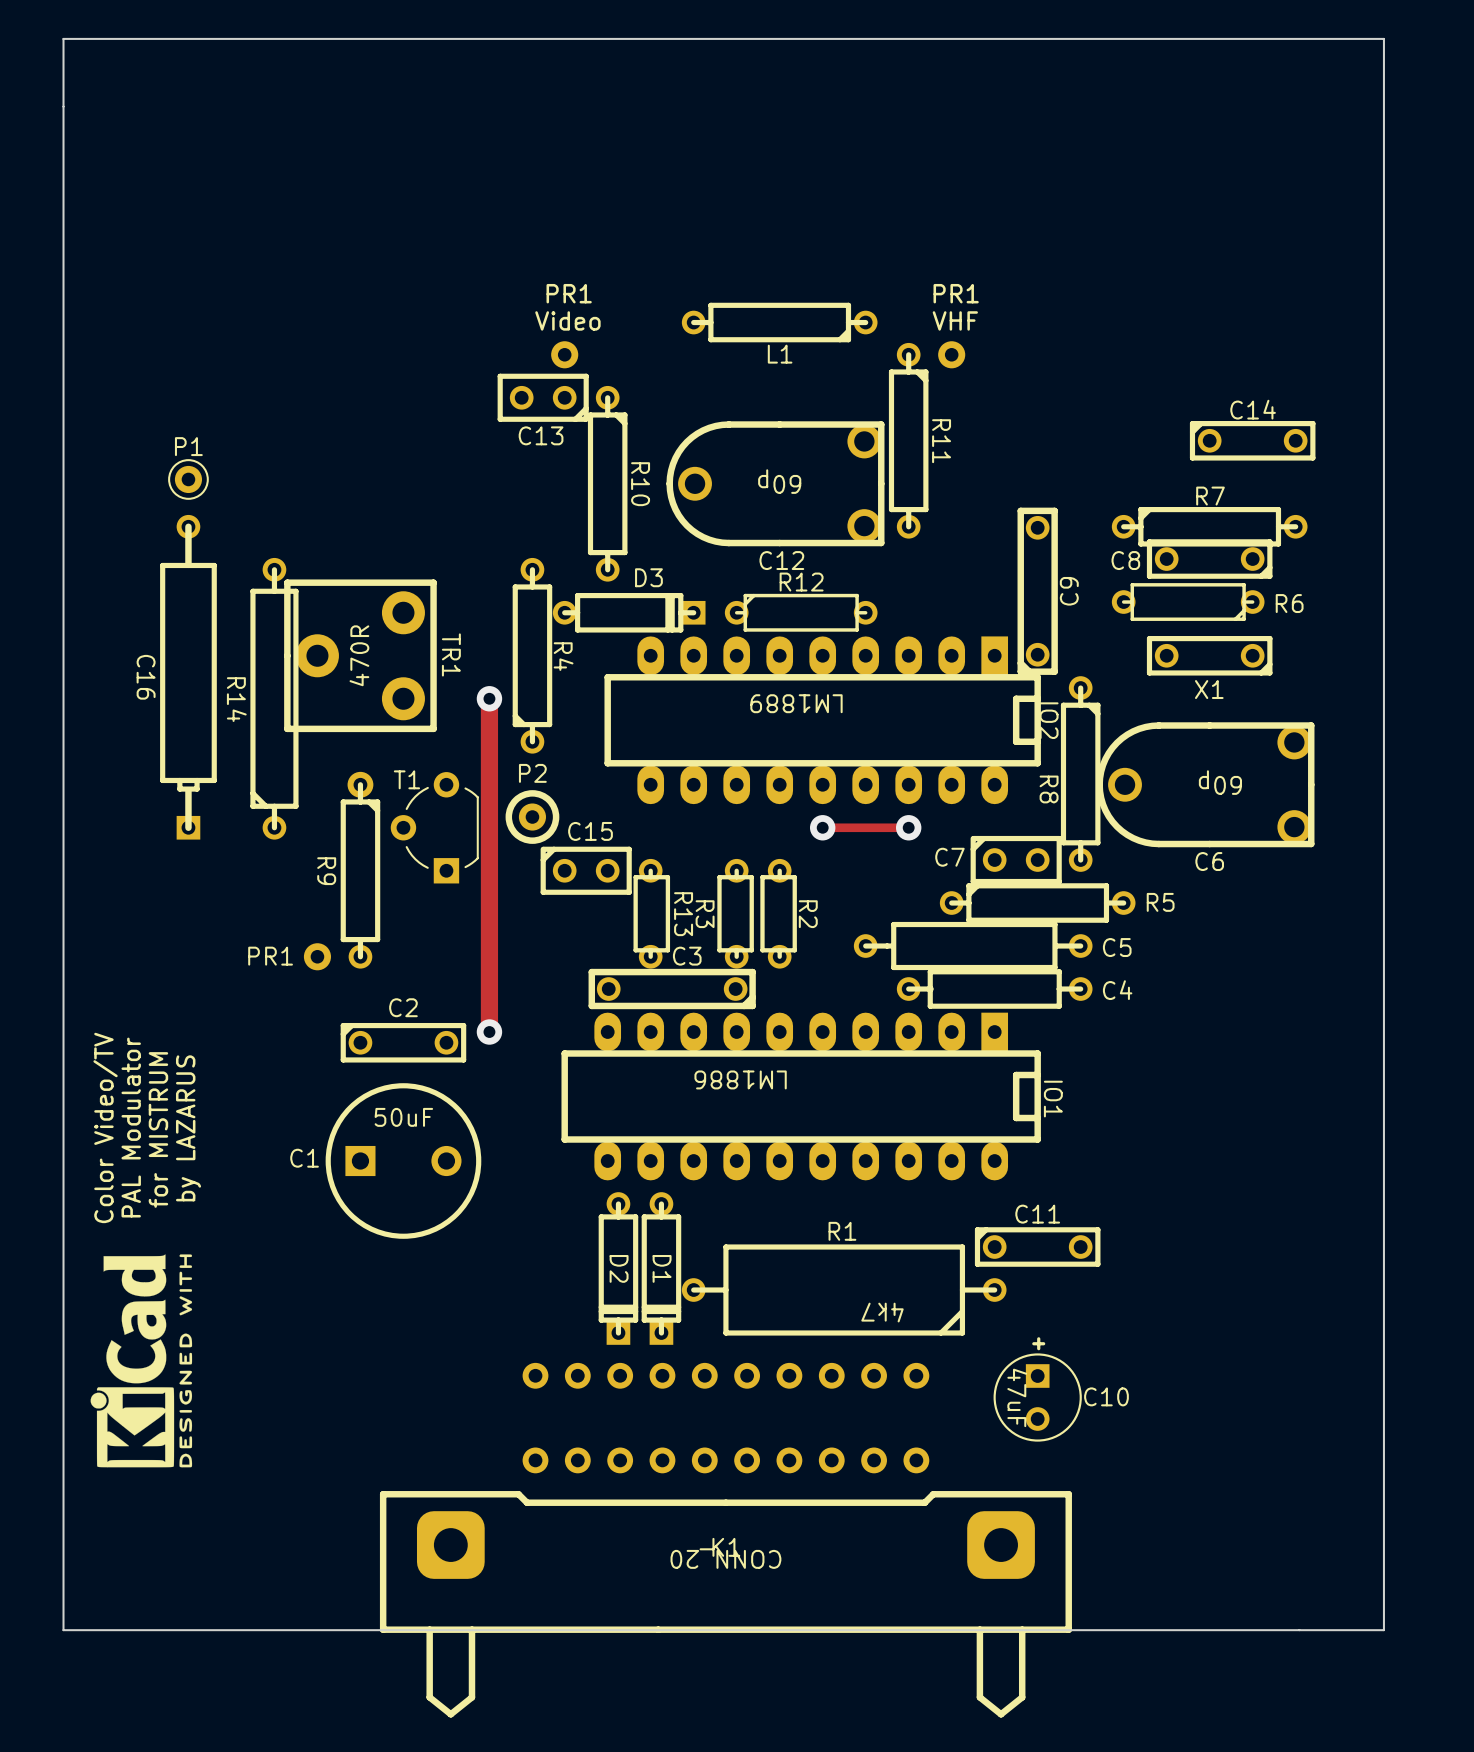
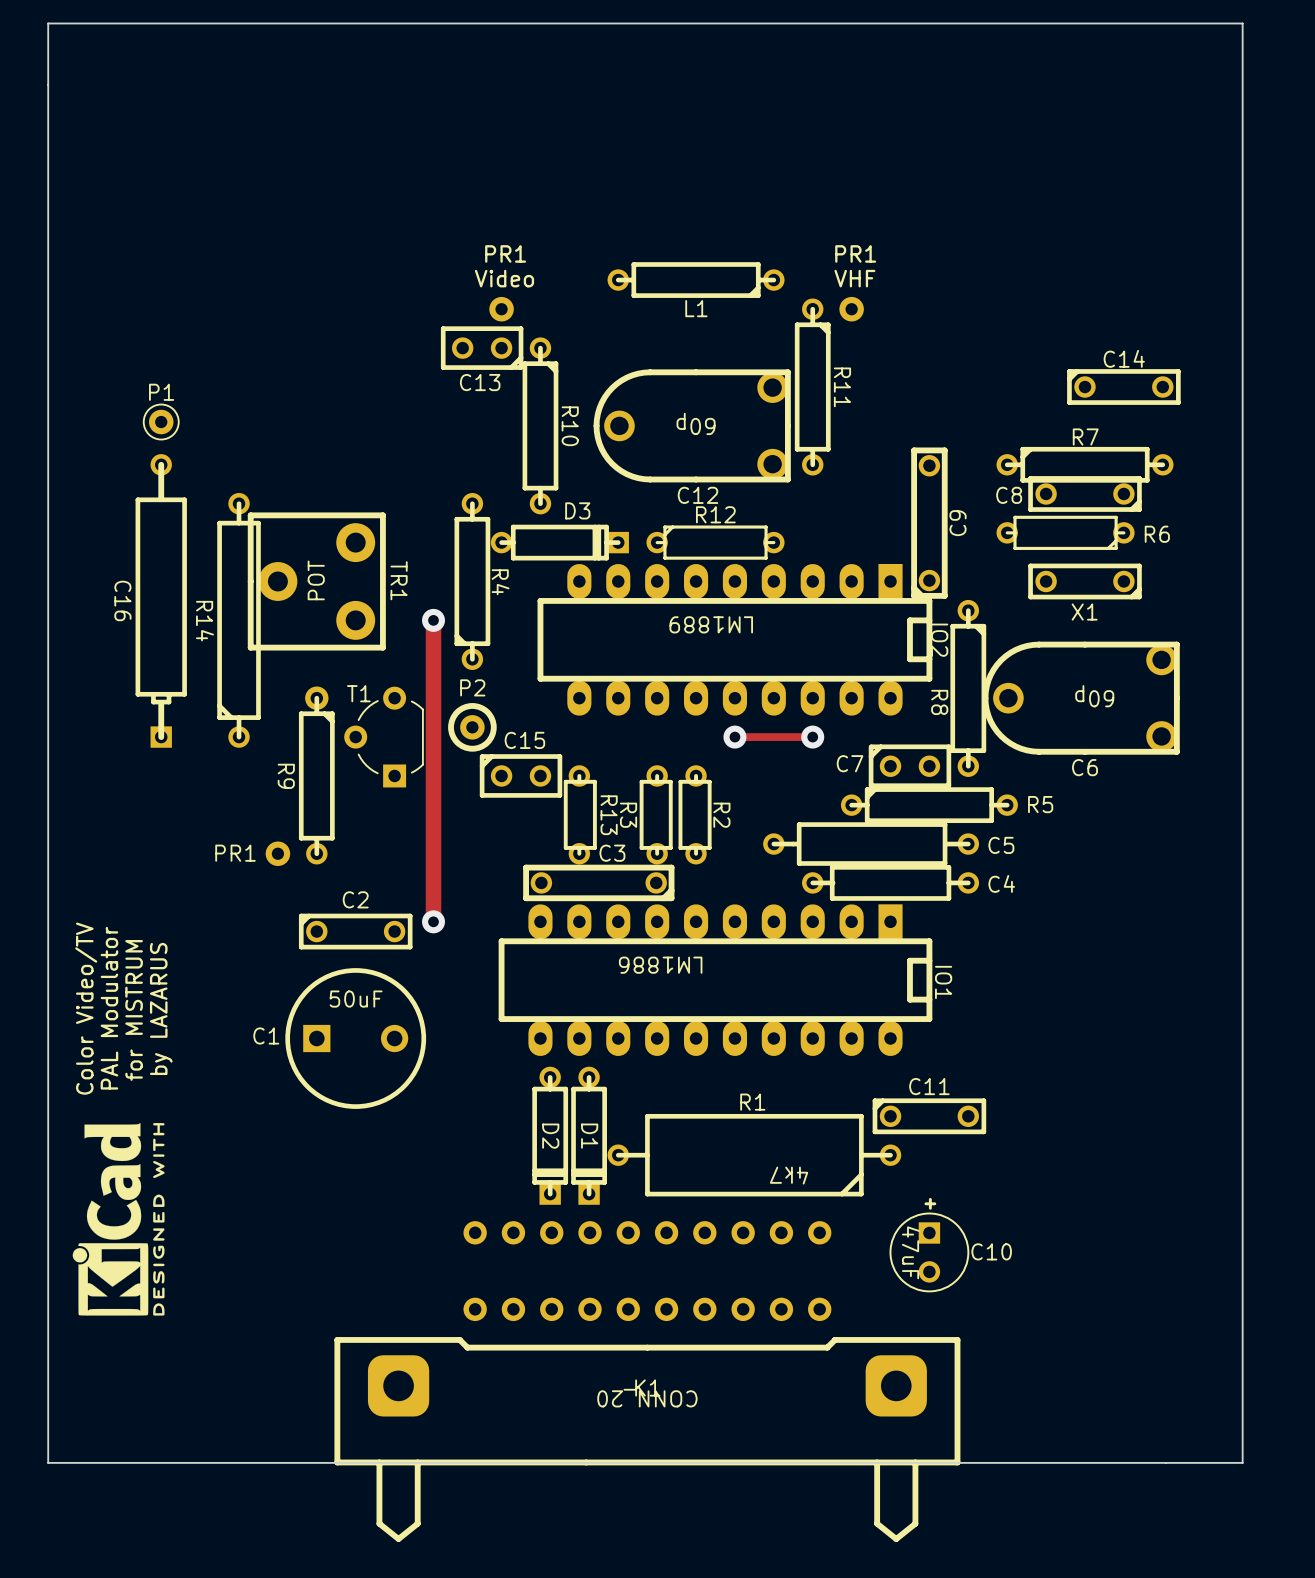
TR1 value: 470R (359, 655) -> POT (316, 580)

